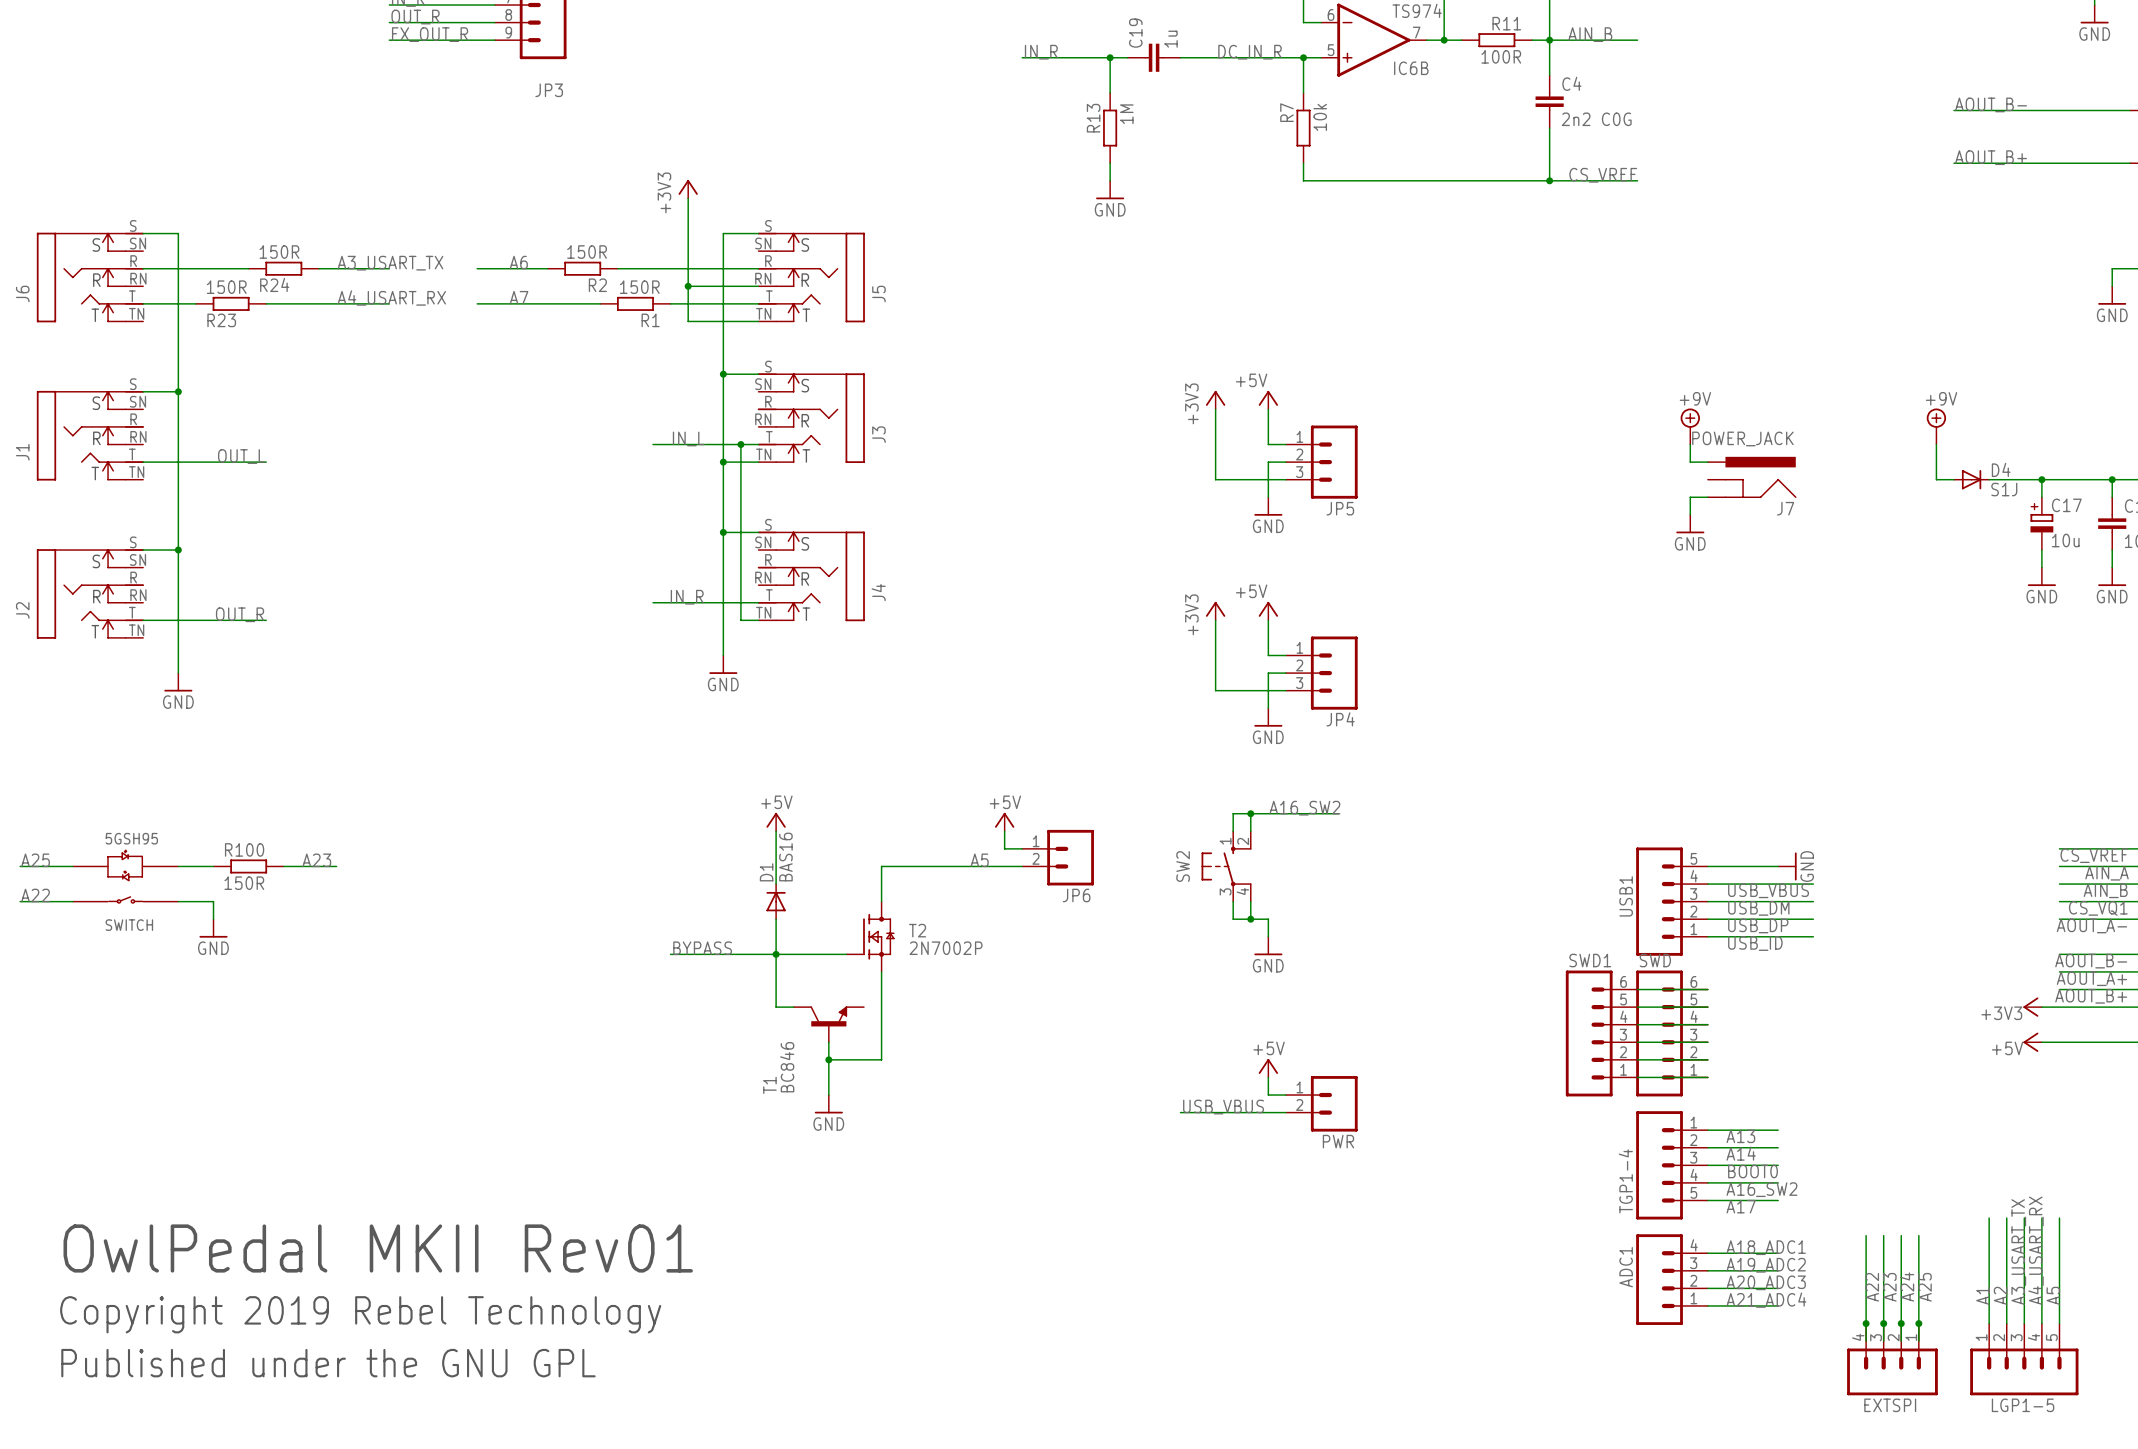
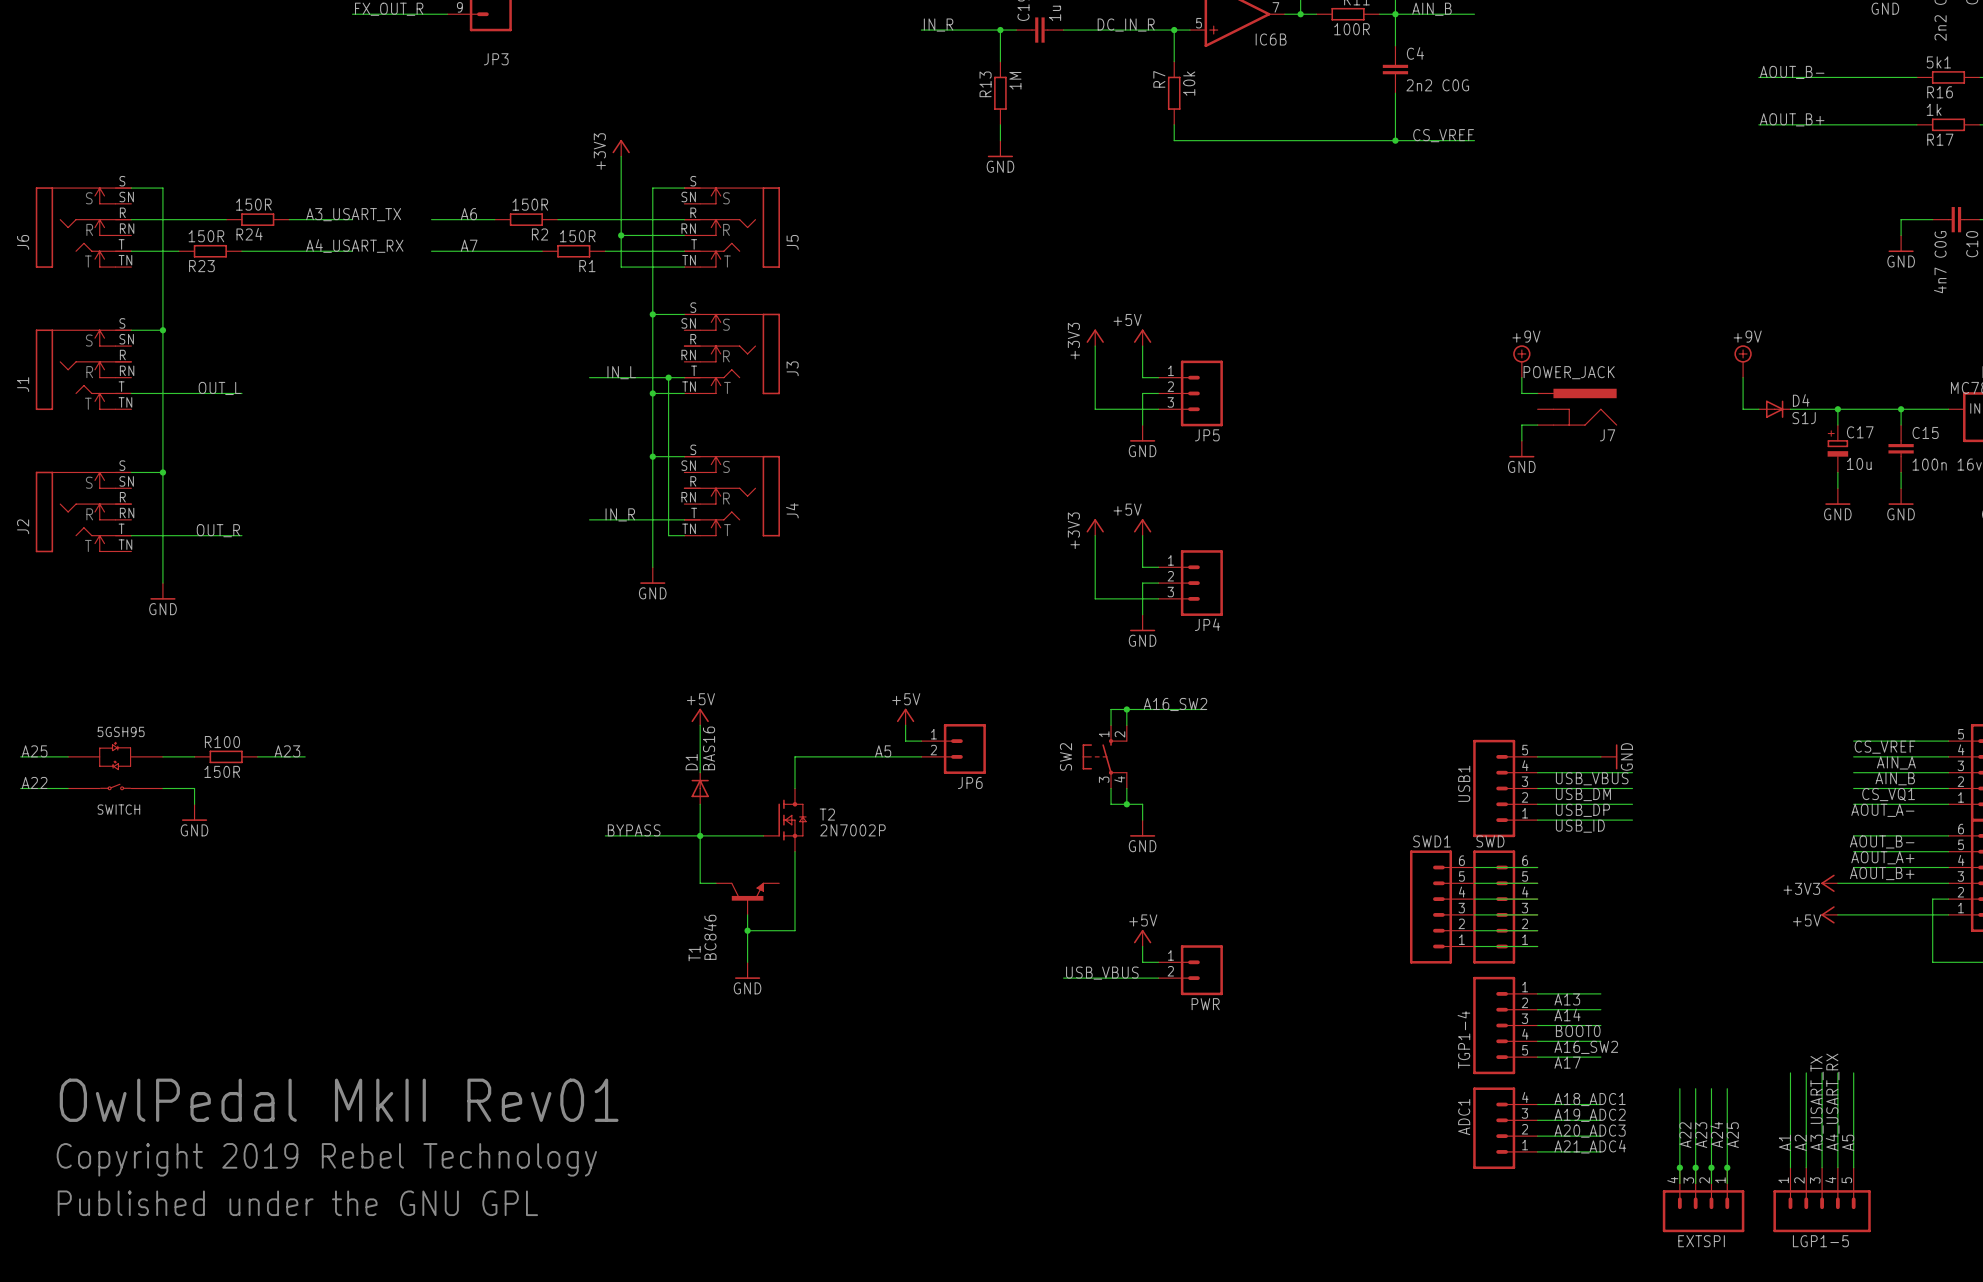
text: OwlPedal MKII Rev01 (378, 1248) -> OwlPedal MkII Rev01 (339, 1100)

